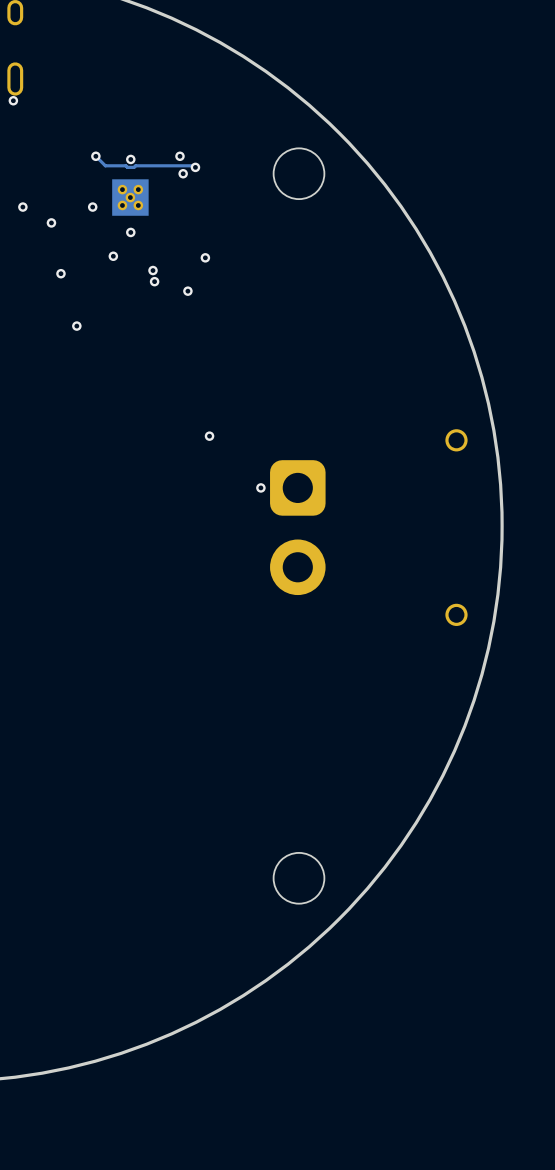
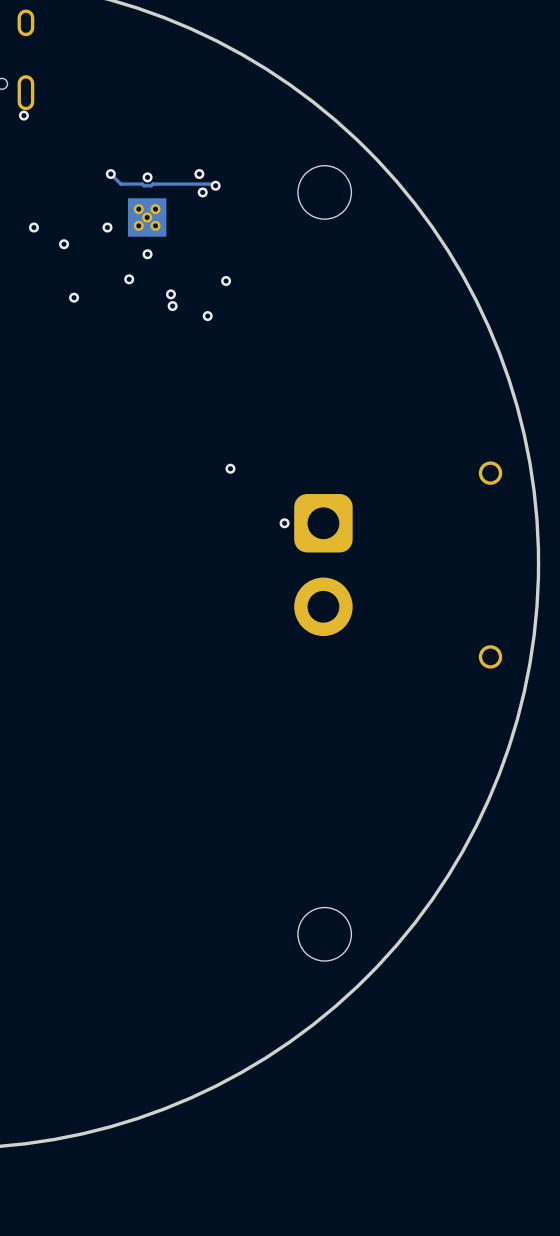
via: (76, 326) -> none

